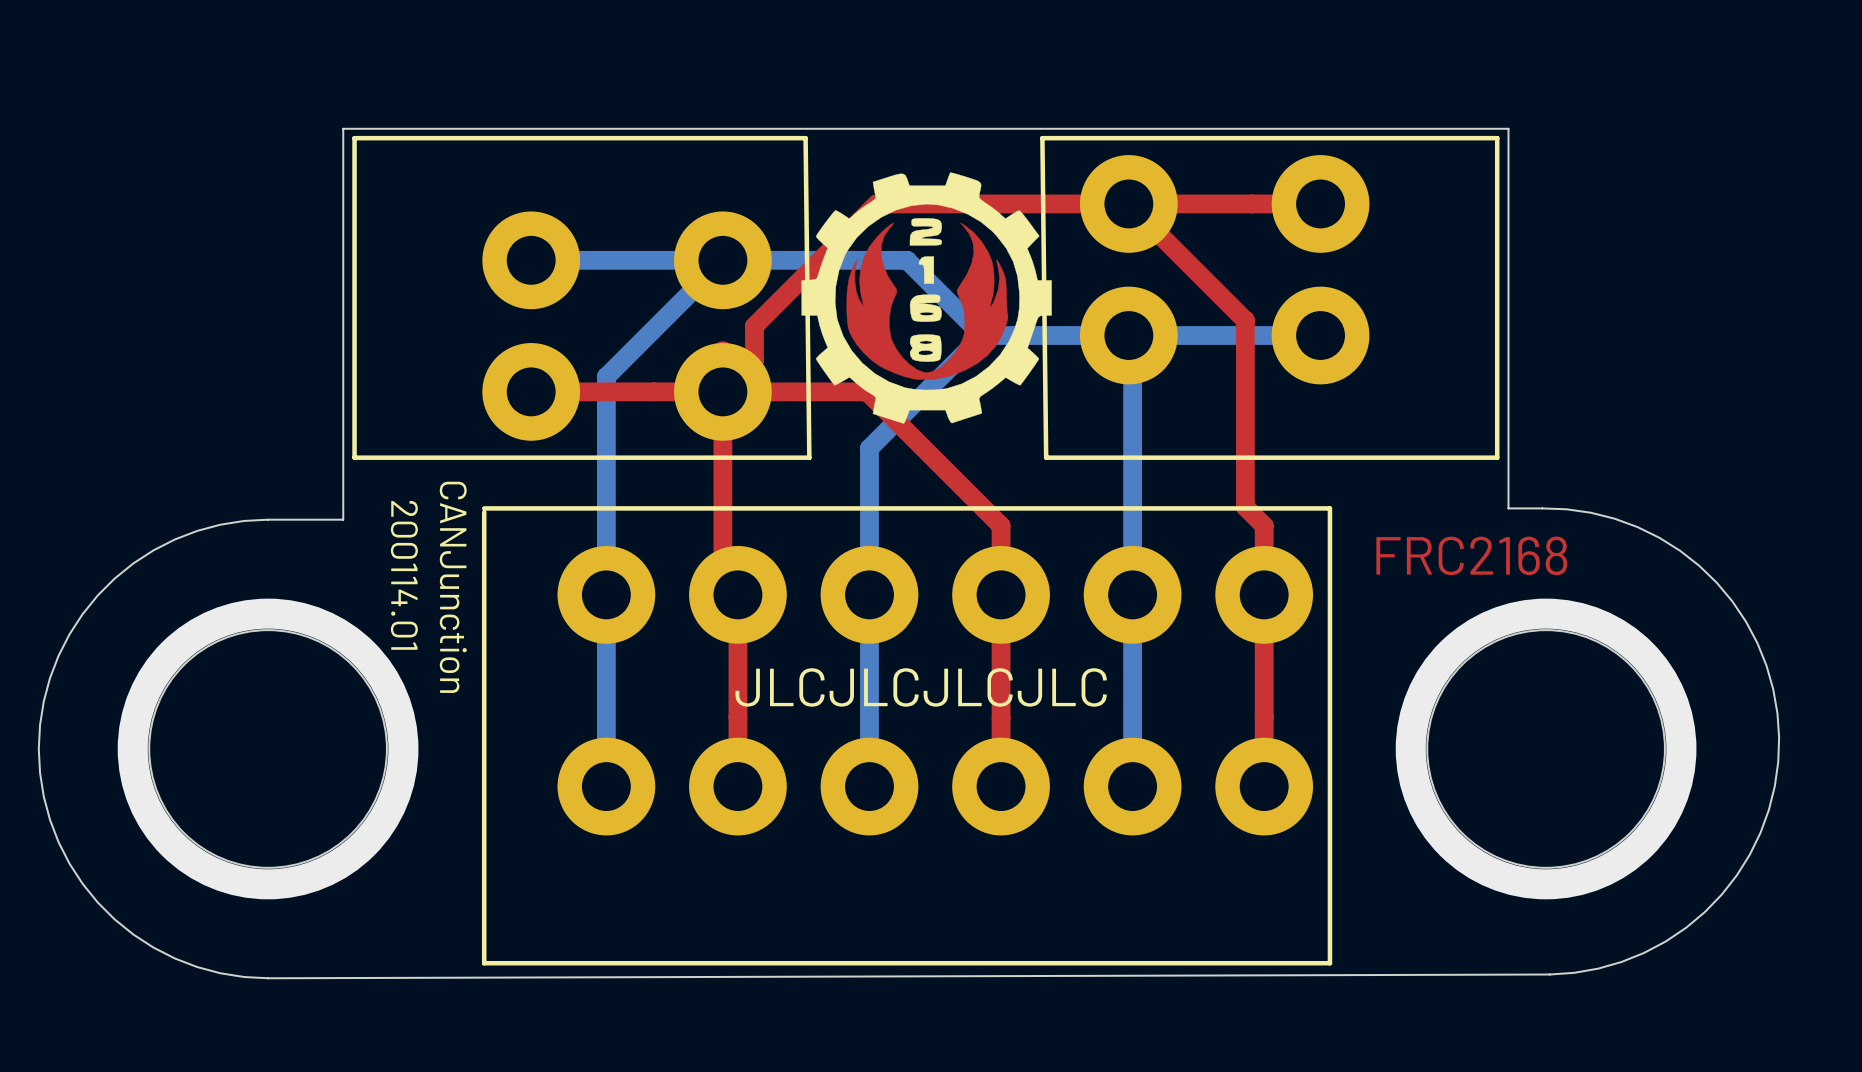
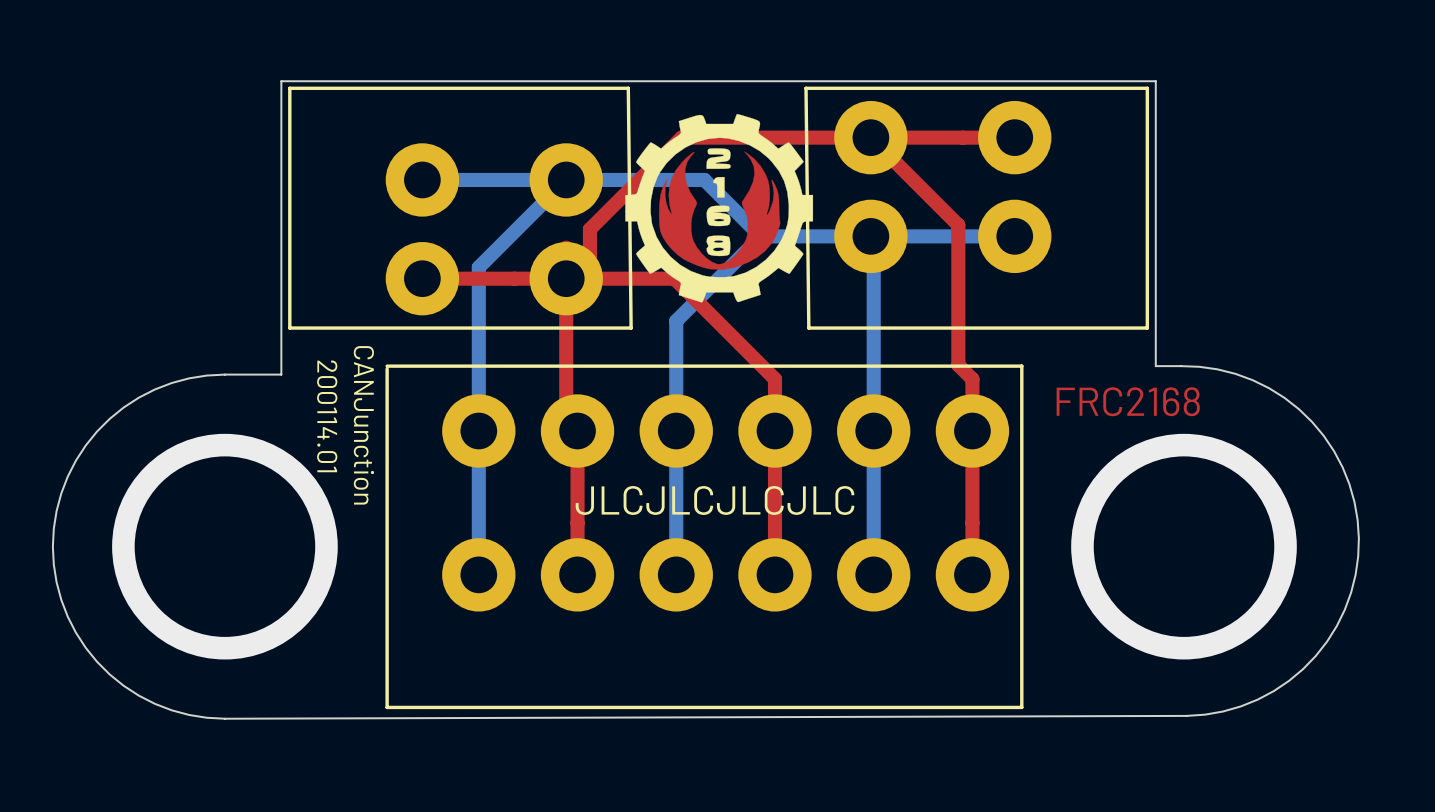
round board edge: [148, 629, 388, 869] -> none
round board edge: [1426, 629, 1666, 869] -> none

